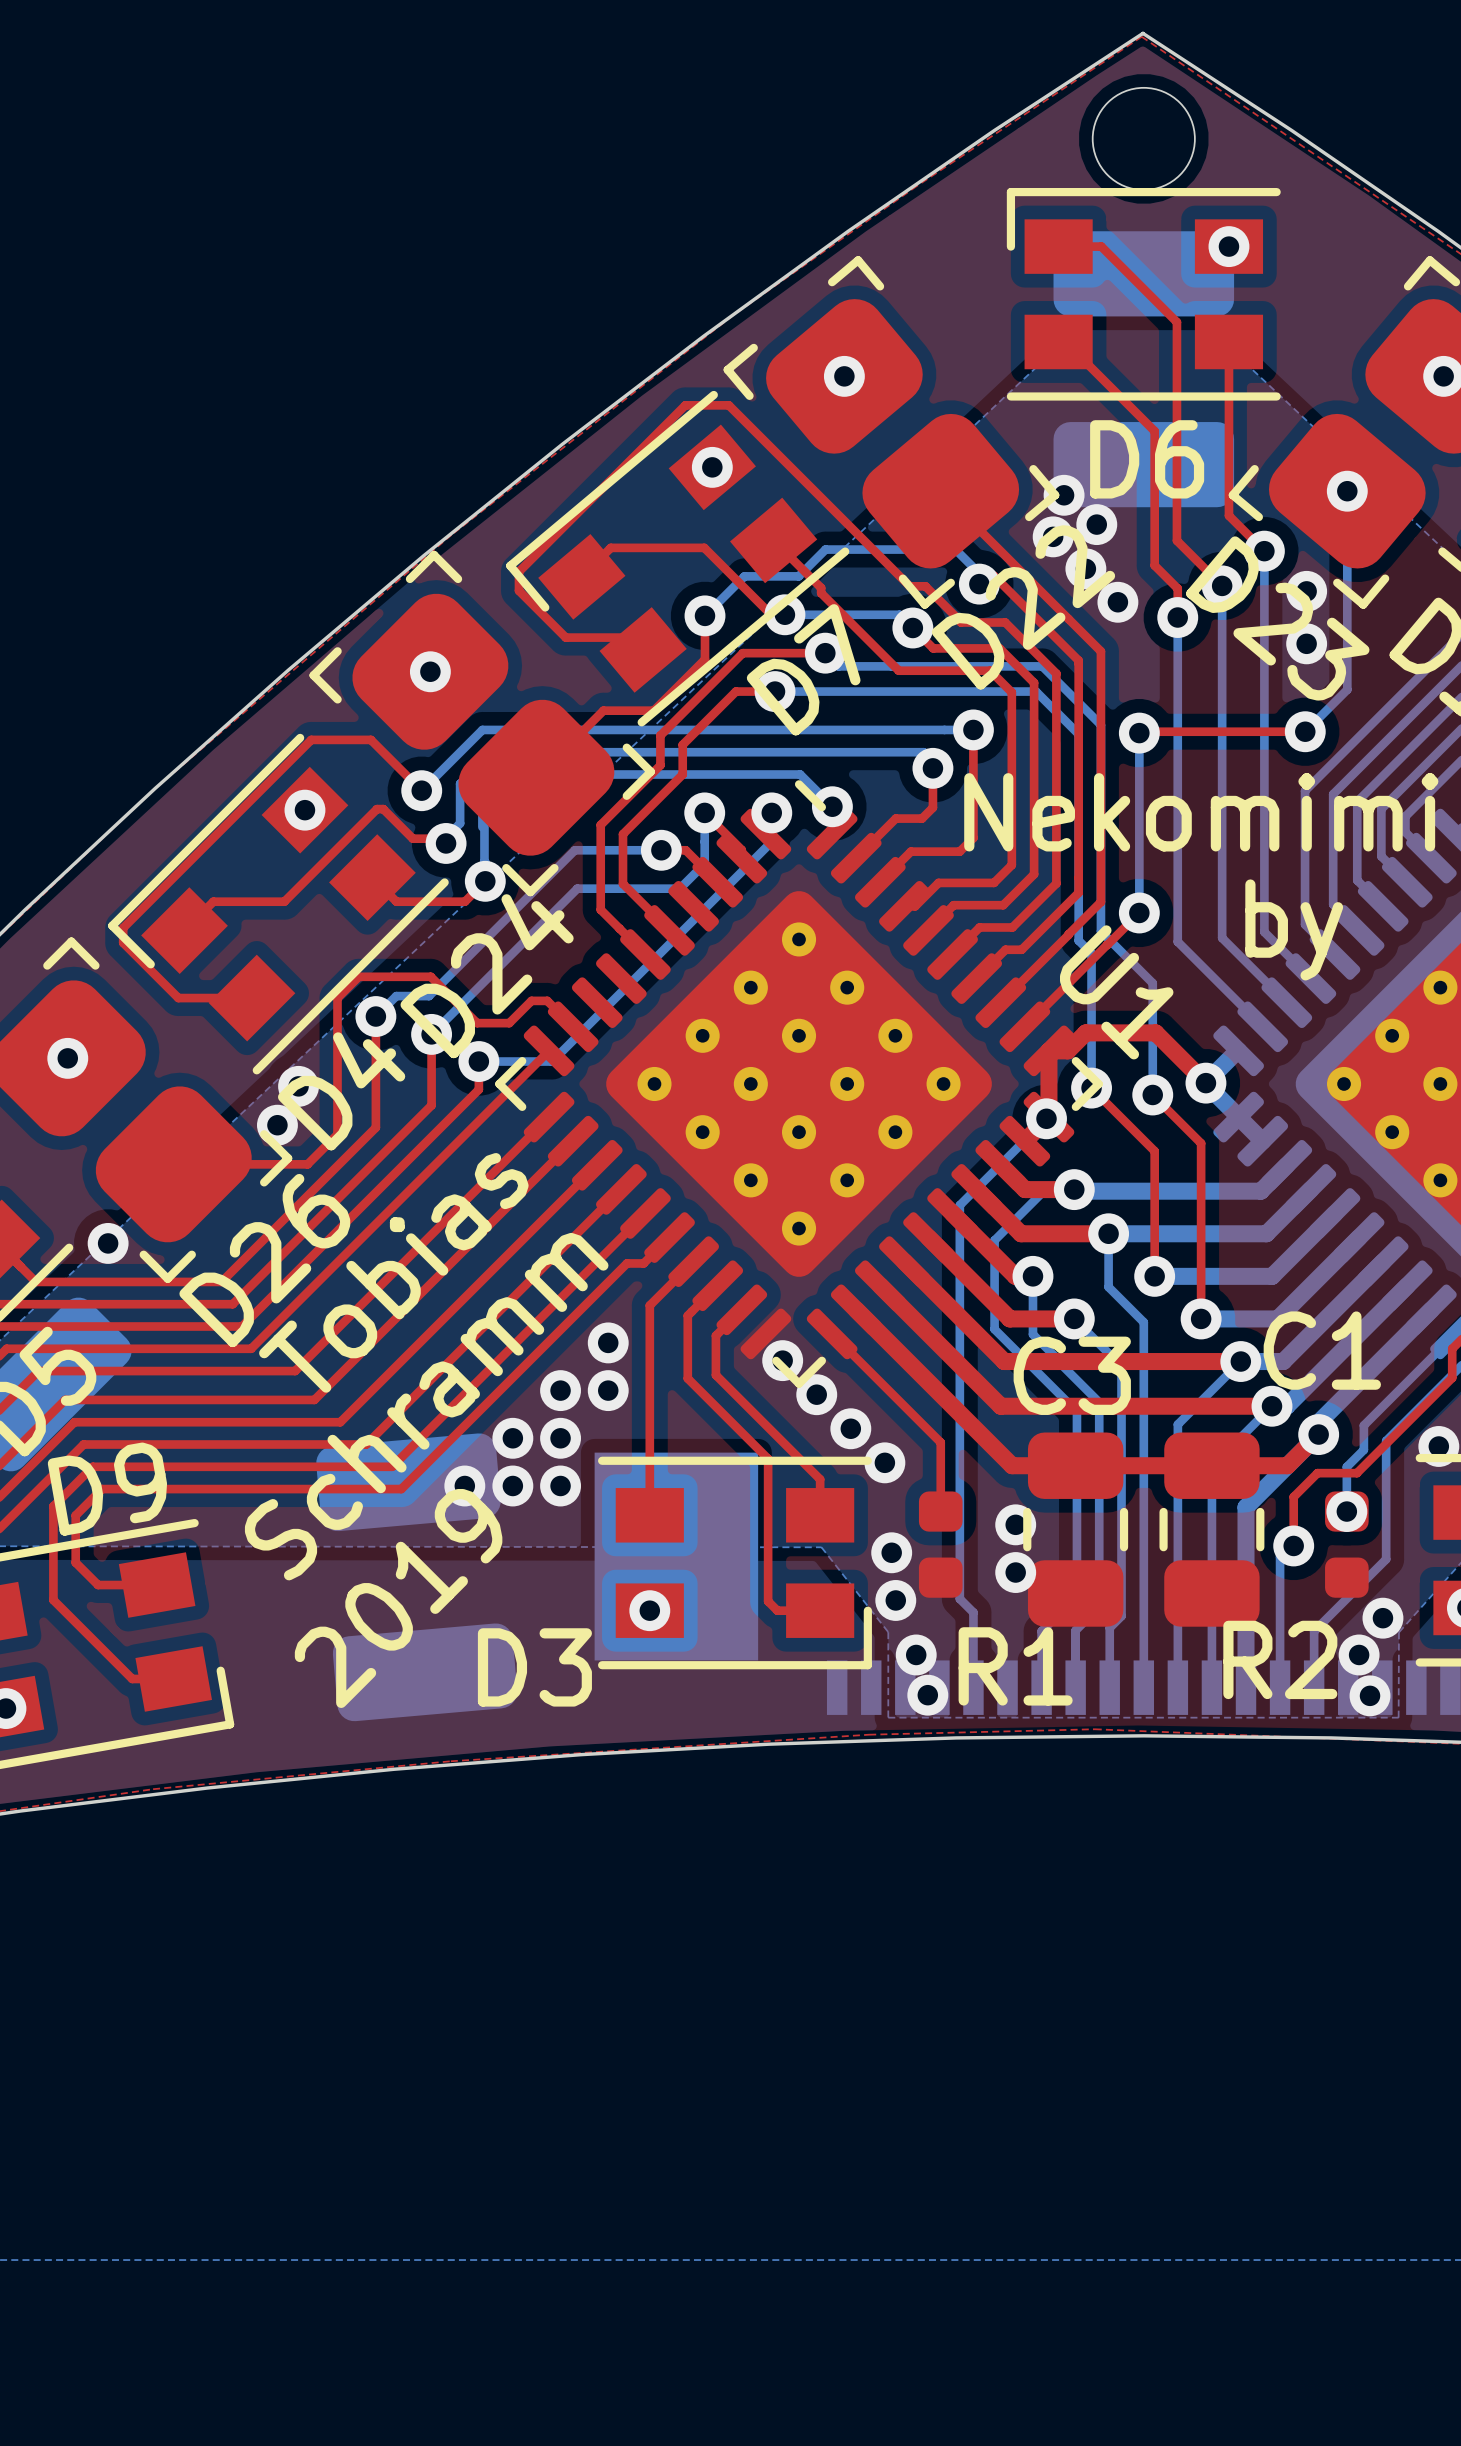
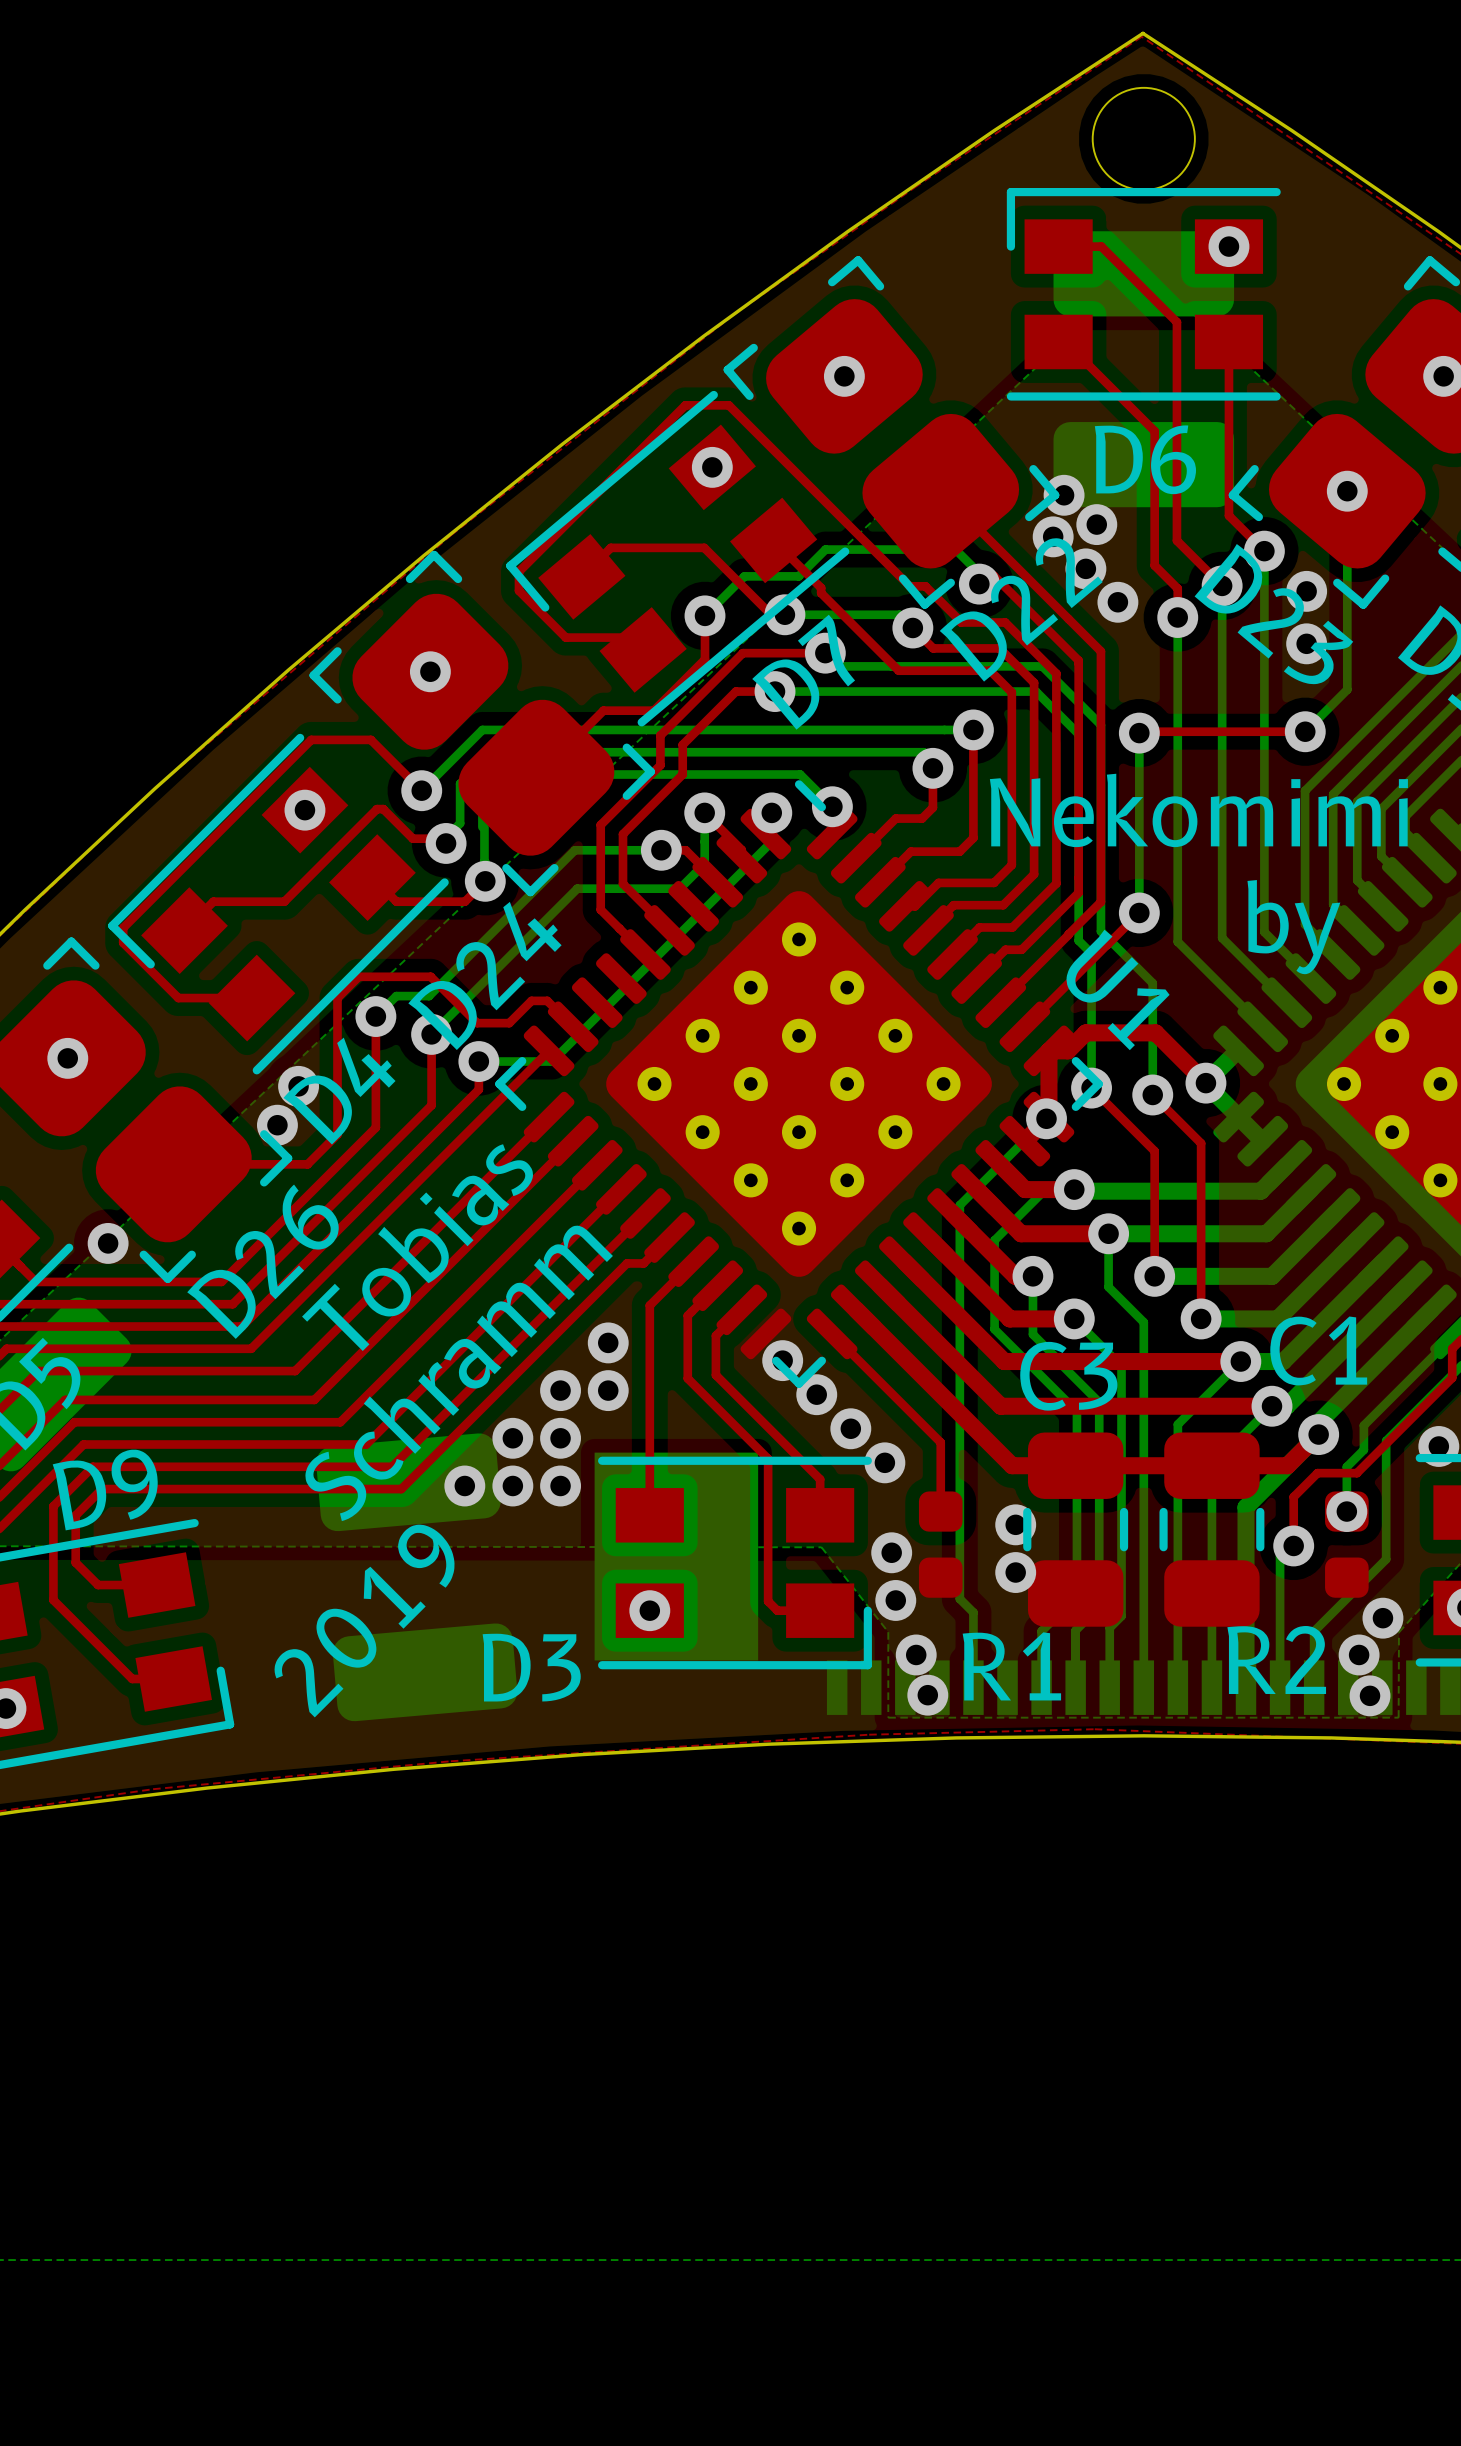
text position: 2019 (398, 1598) -> 2019 (364, 1620)

